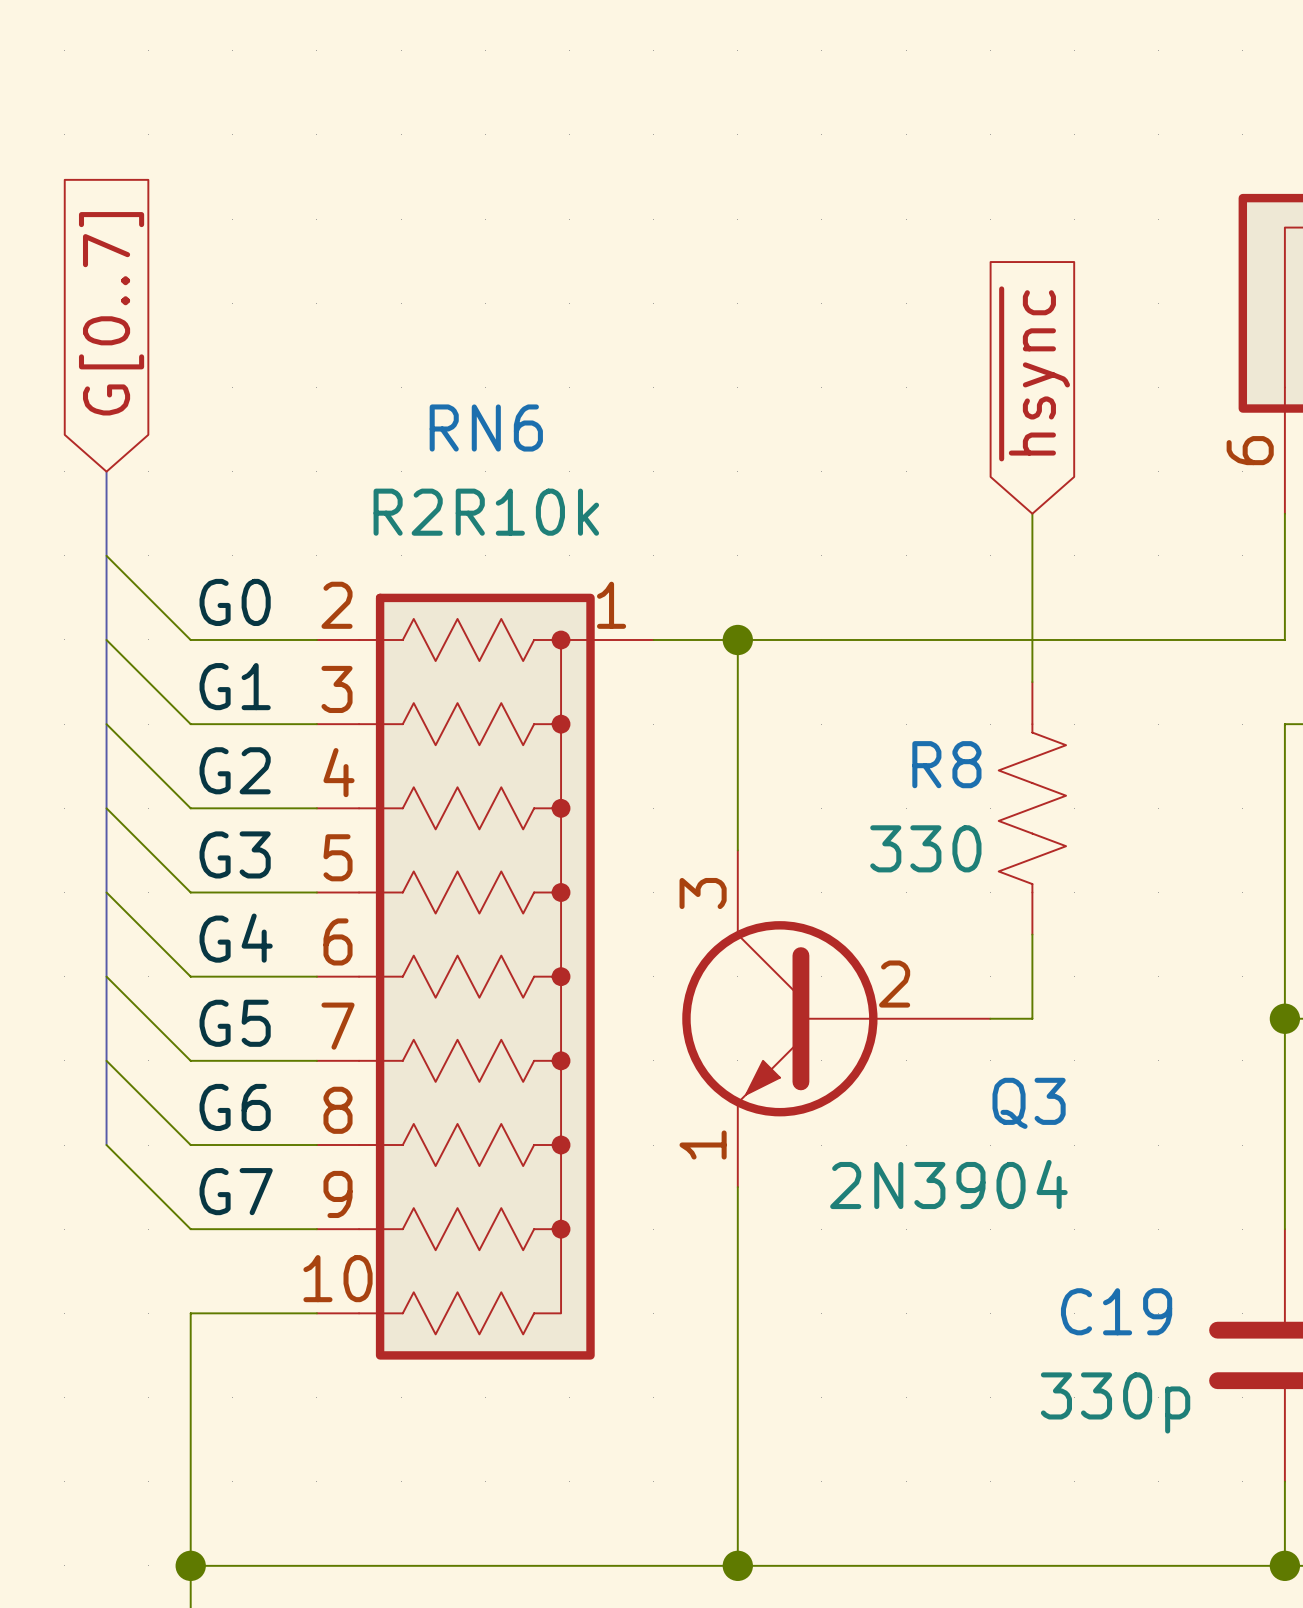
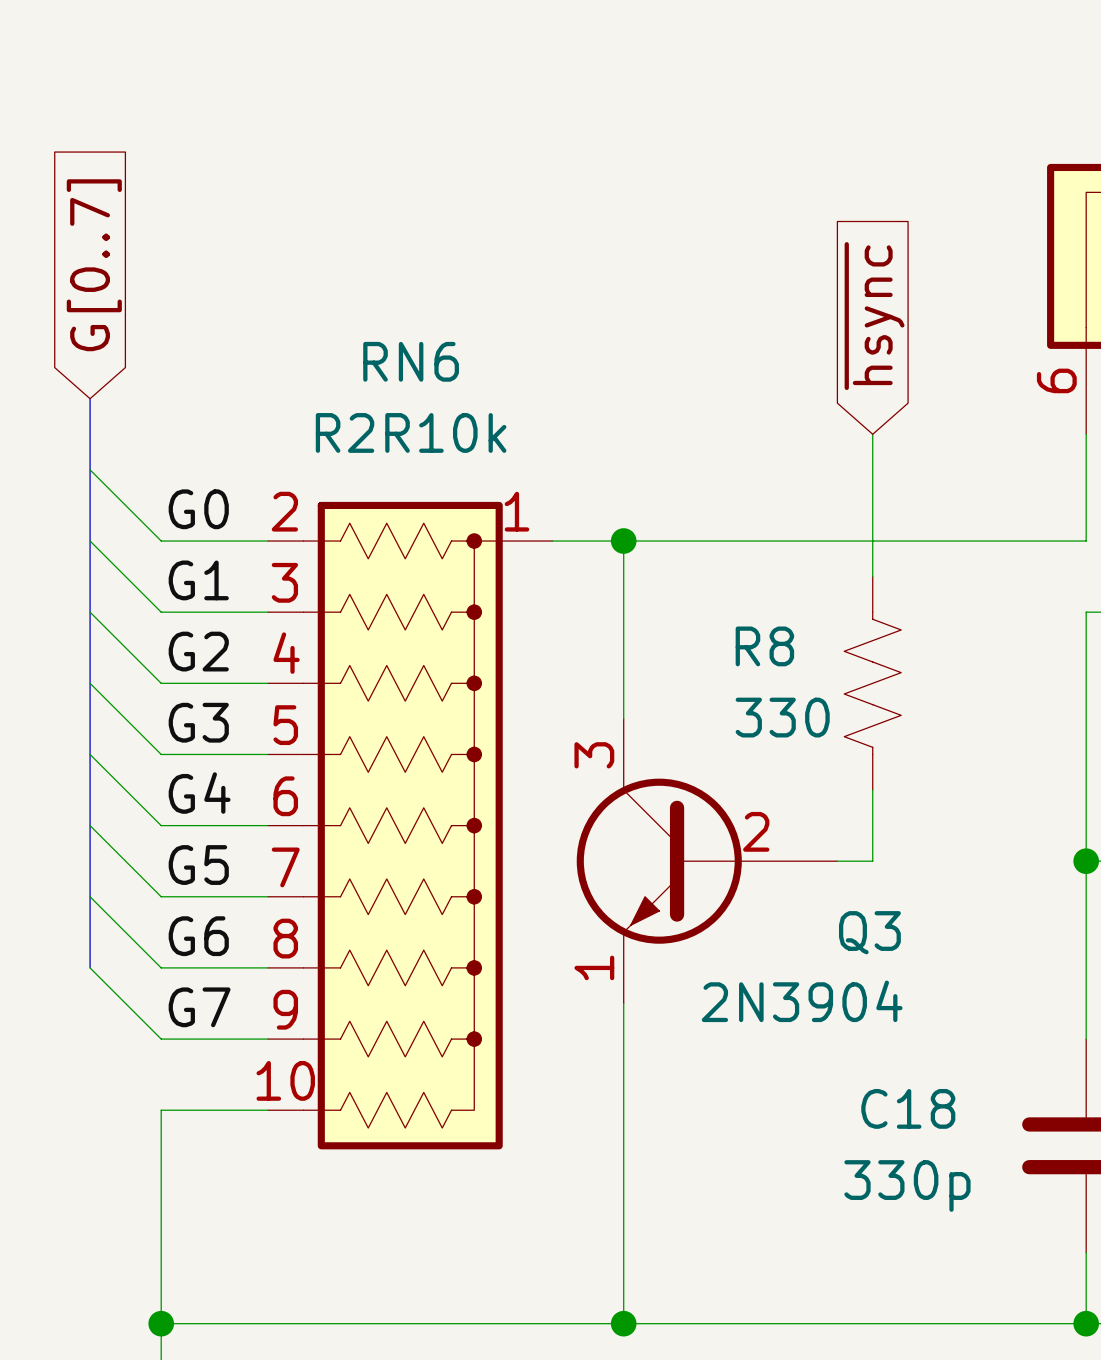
R8 name position: R8 (946, 764) -> R8 (764, 646)
C19 name: C19 (1116, 1311) -> C18 (908, 1108)
C19 value position: 330p (1115, 1402) -> 330p (907, 1185)

